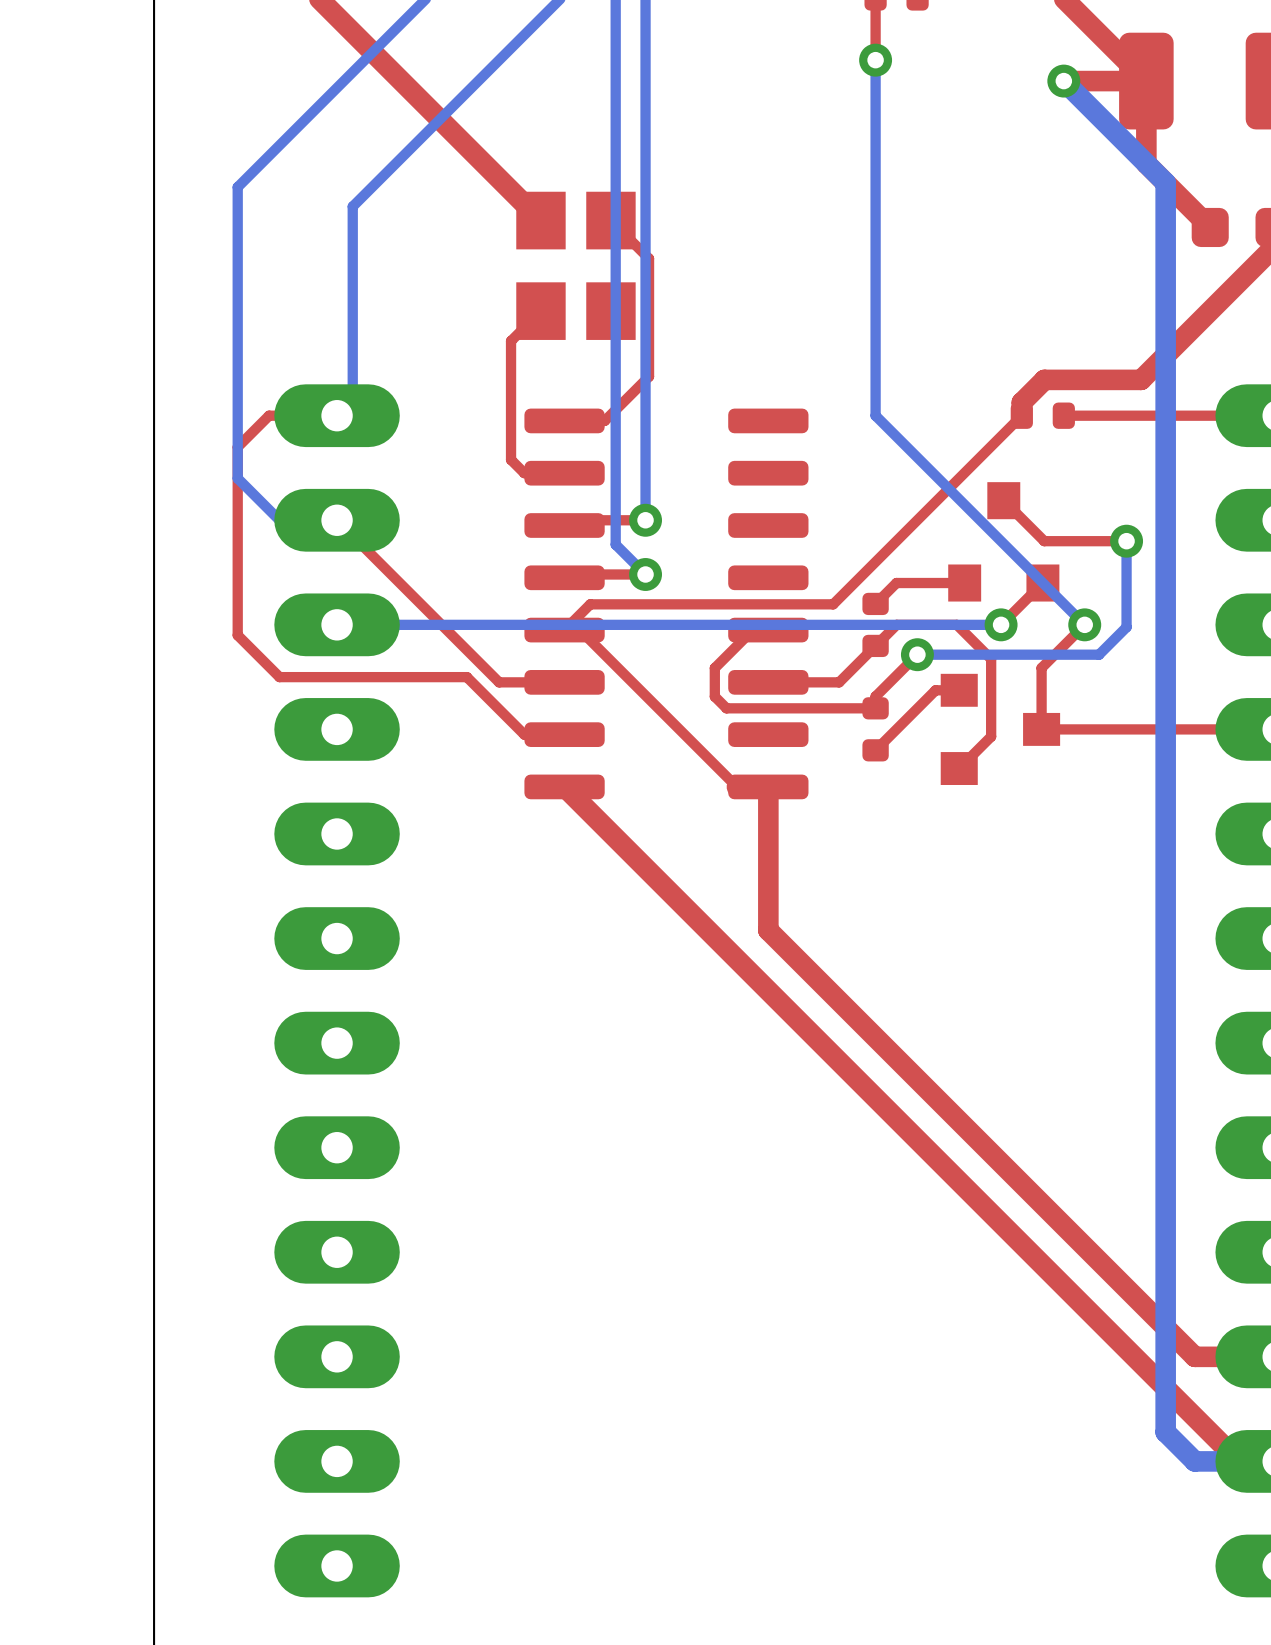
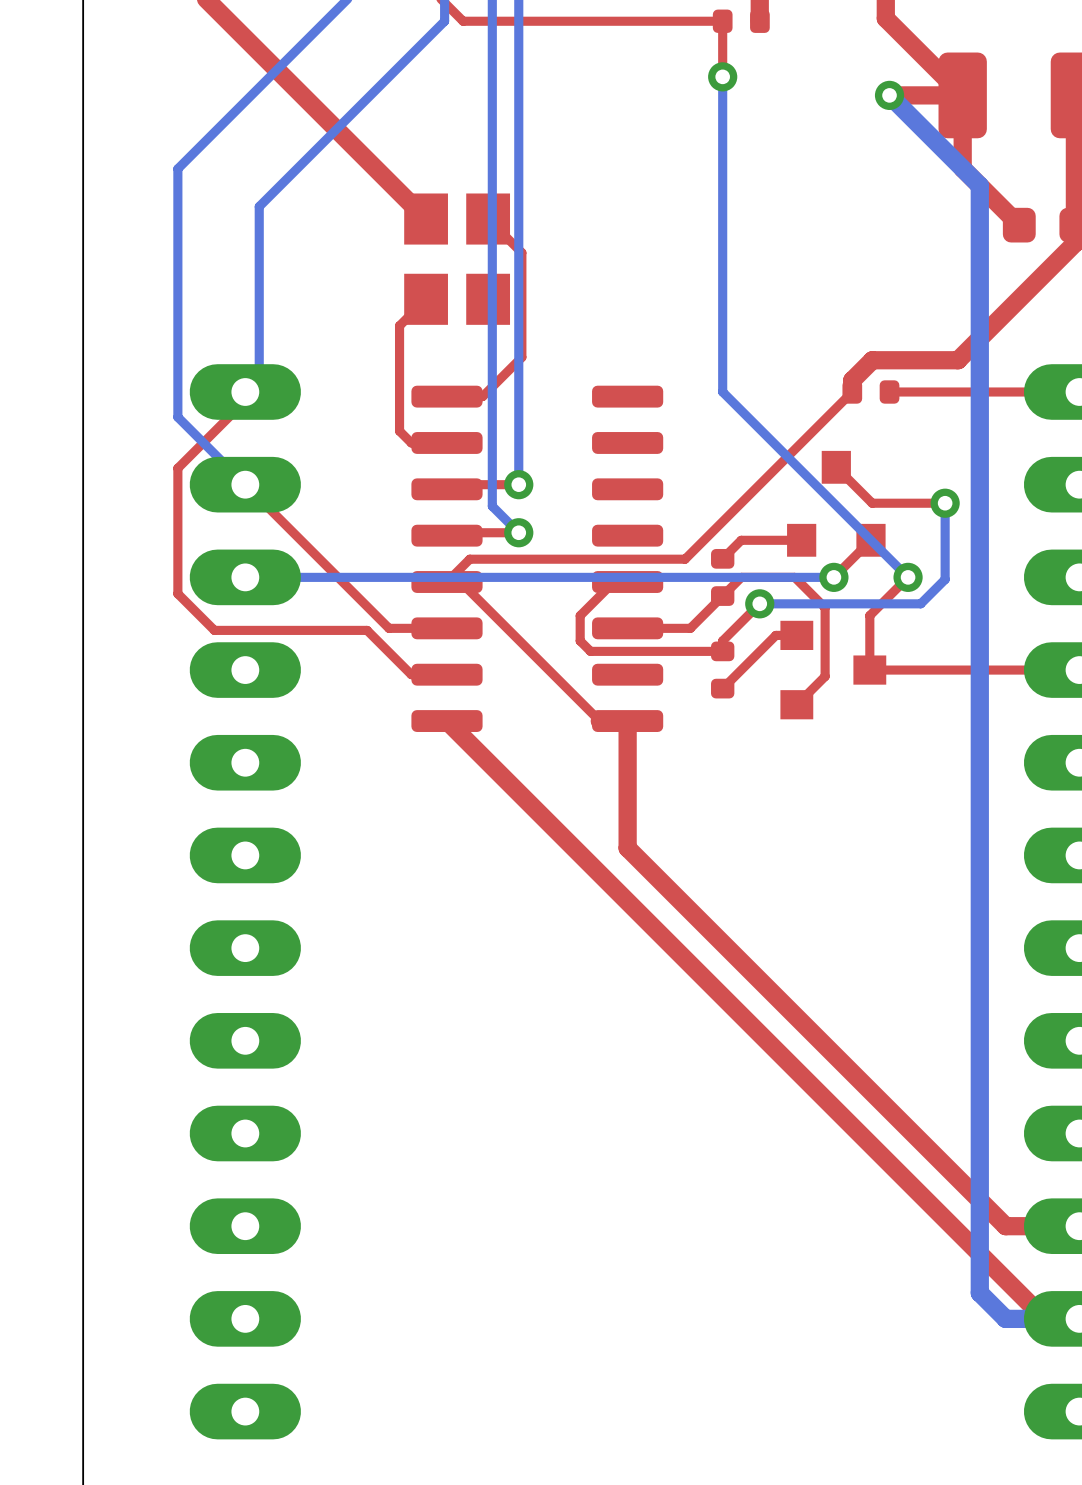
bottom track: (260, 163) (237, 187) (237, 478) (279, 520) (337, 520) -> (177, 168) (177, 417) (245, 484)
top track: (337, 415) (269, 415) (237, 447) (237, 635) (279, 677) (466, 677) (474, 684) -> (245, 392) (245, 400) (177, 468) (177, 593) (214, 630) (367, 630)

